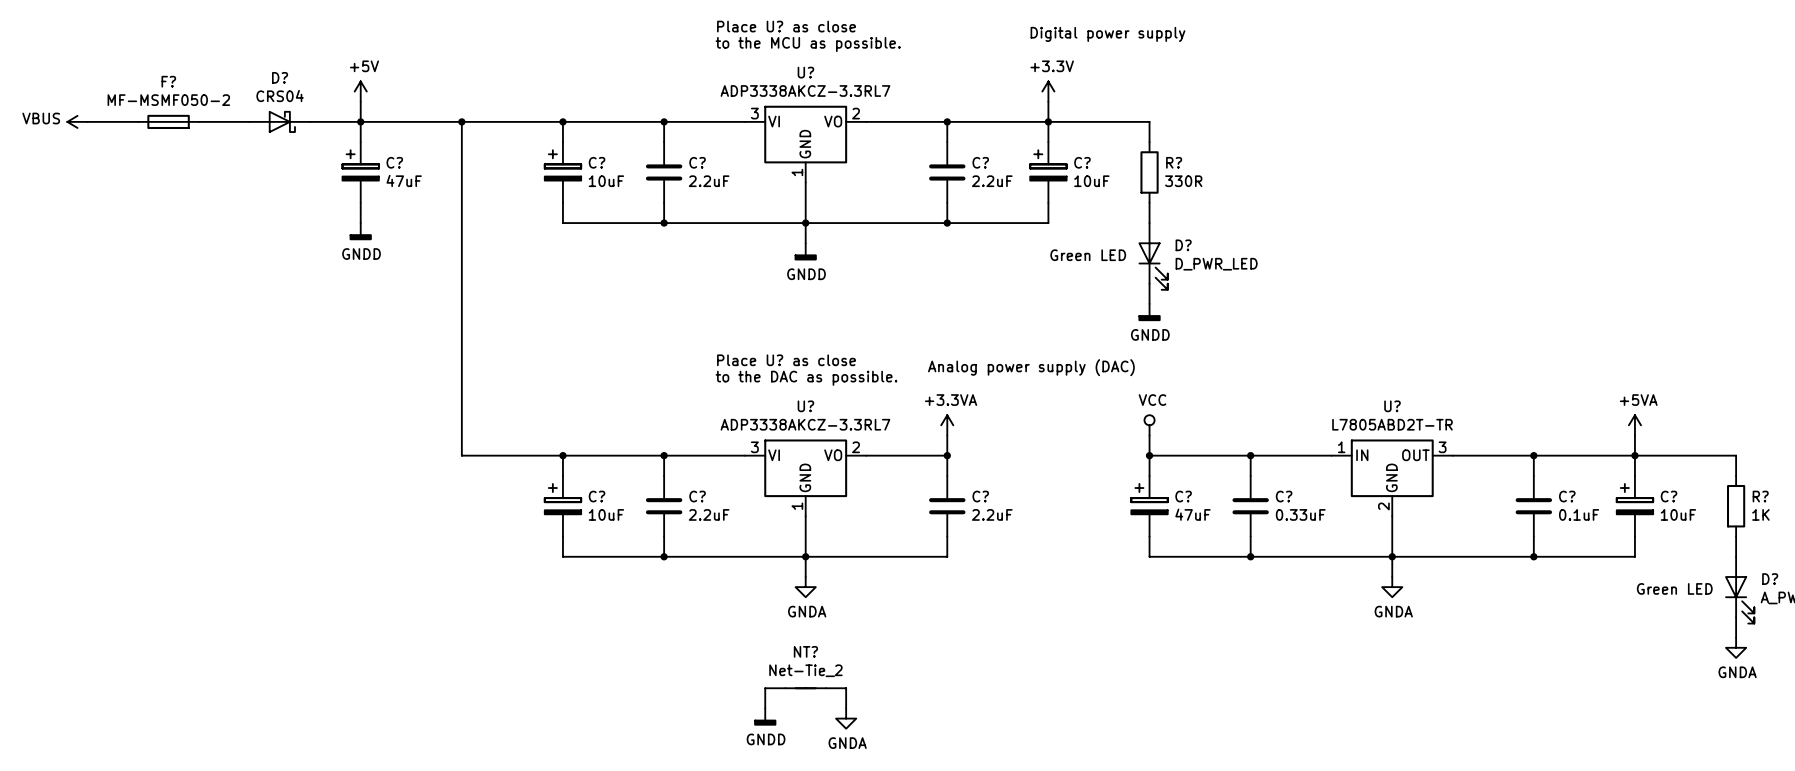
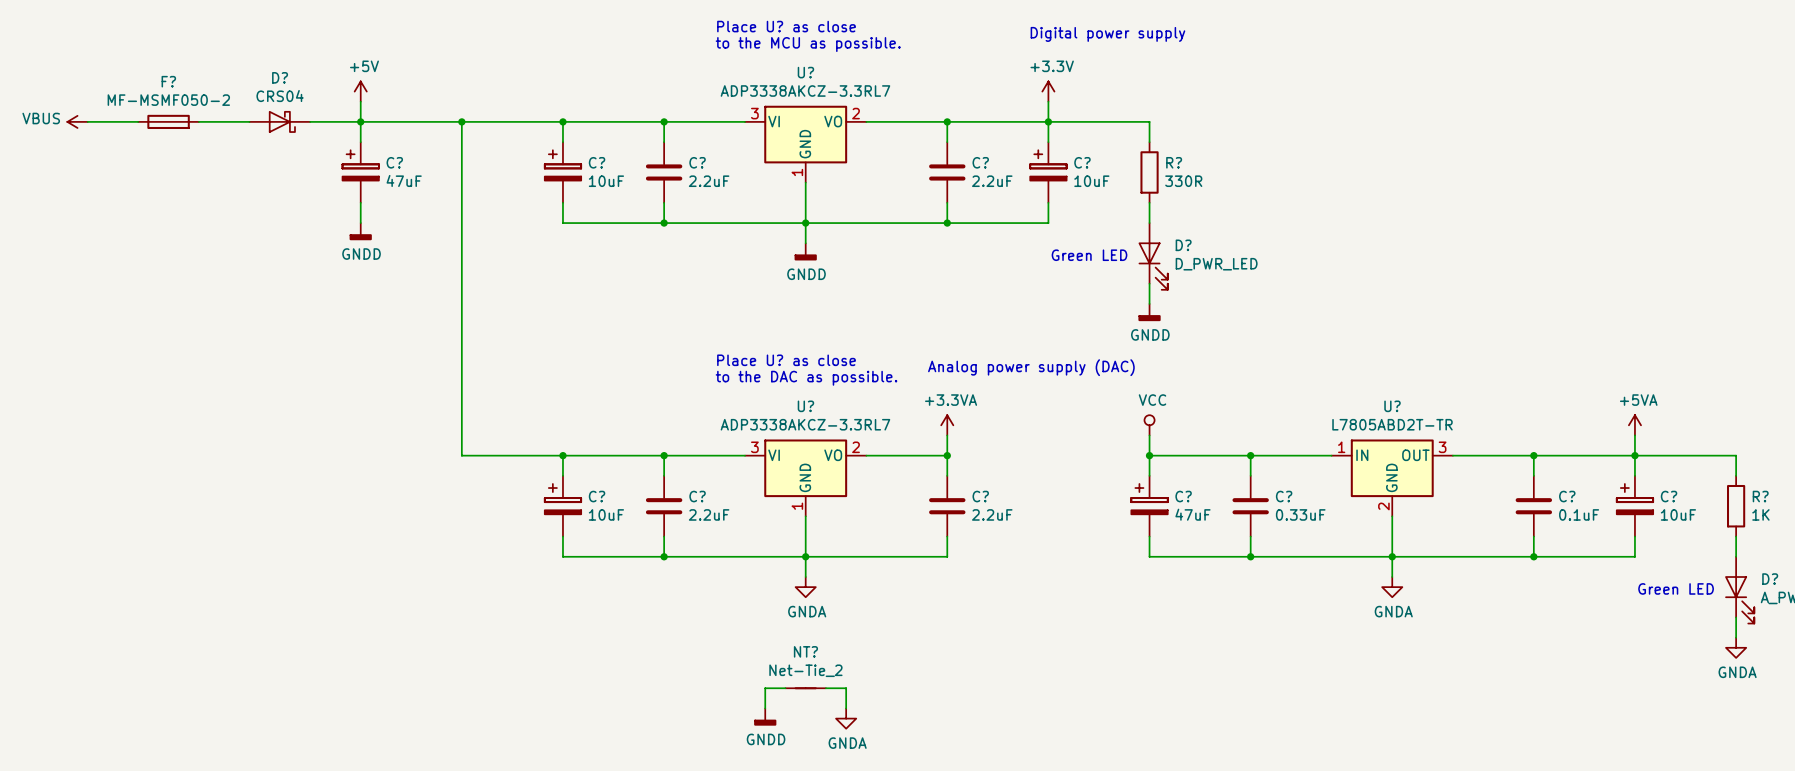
text position: Green LED (1088, 255) -> Green LED (1089, 255)
text position: Green LED (1674, 588) -> Green LED (1676, 588)

